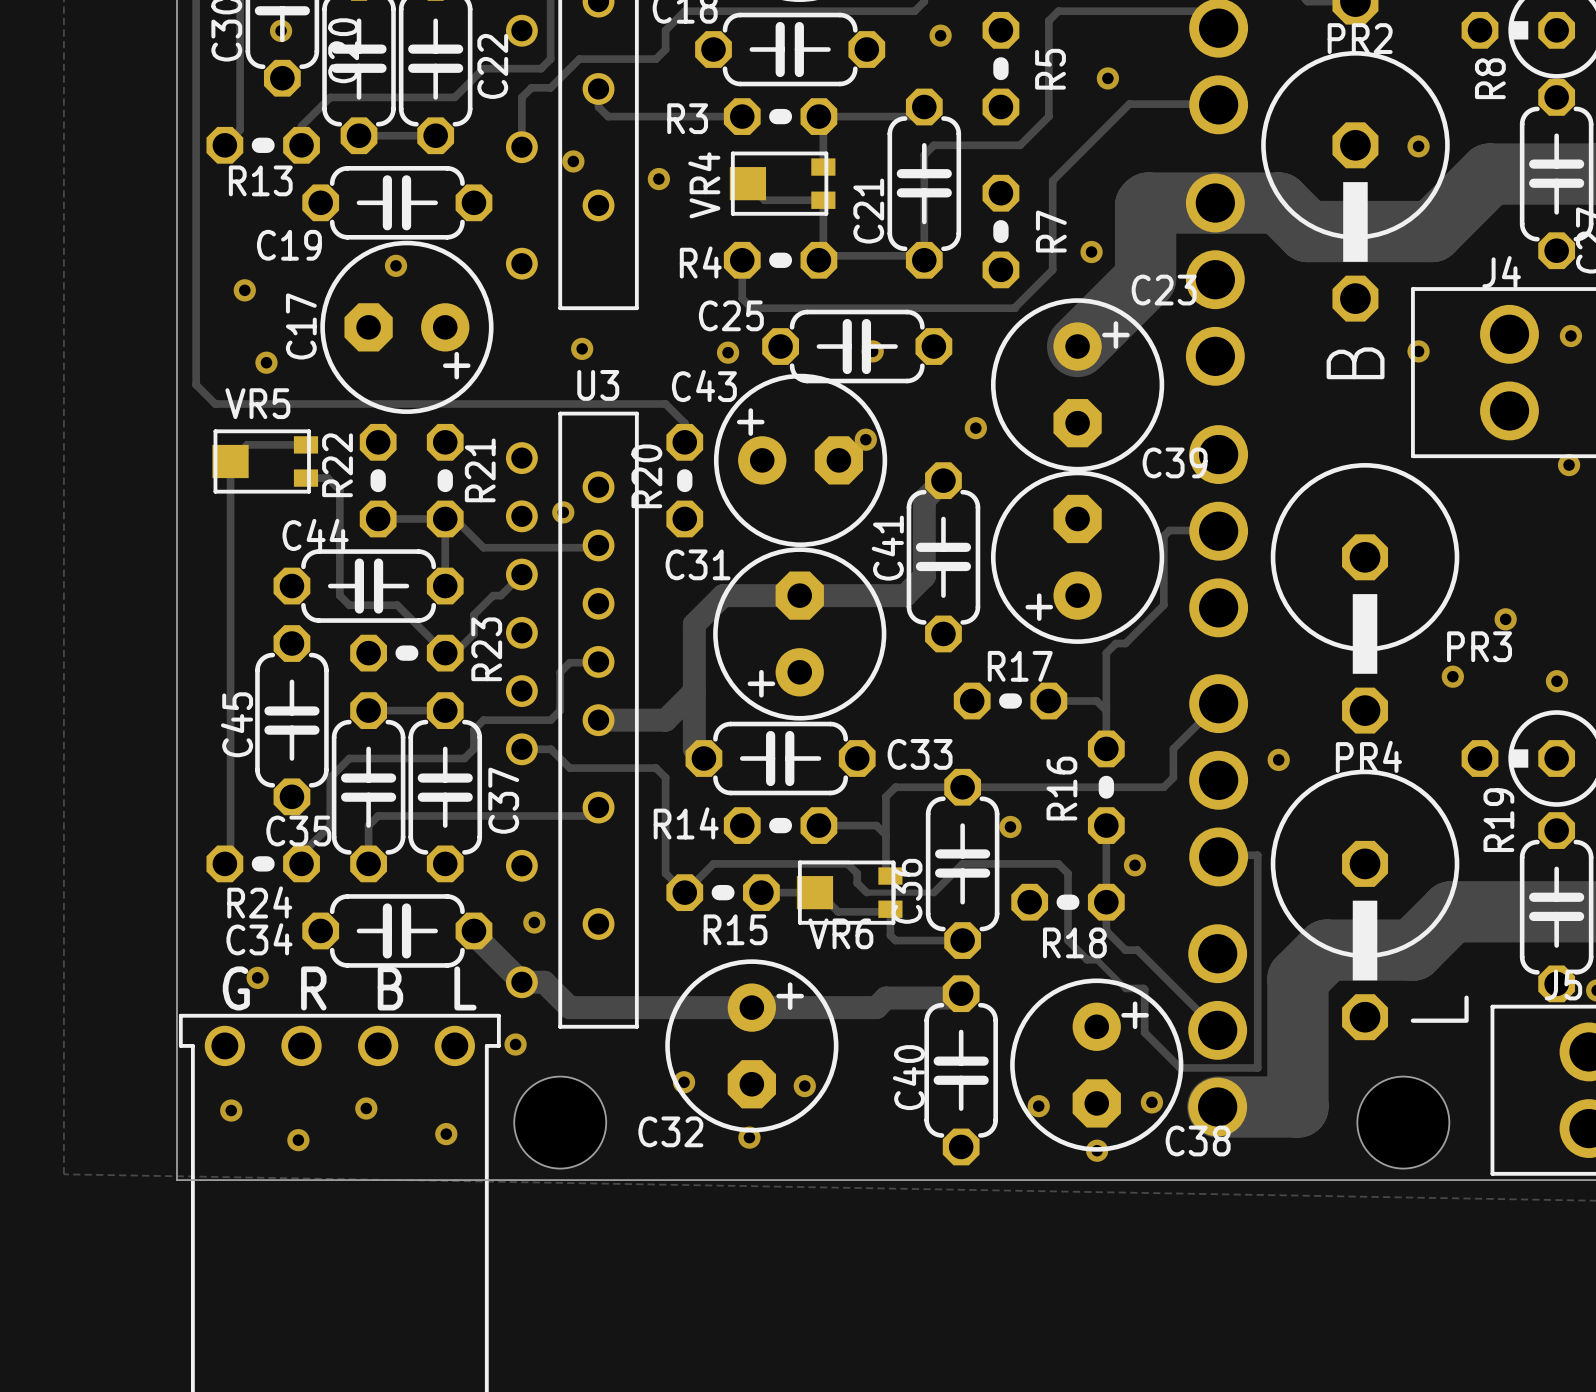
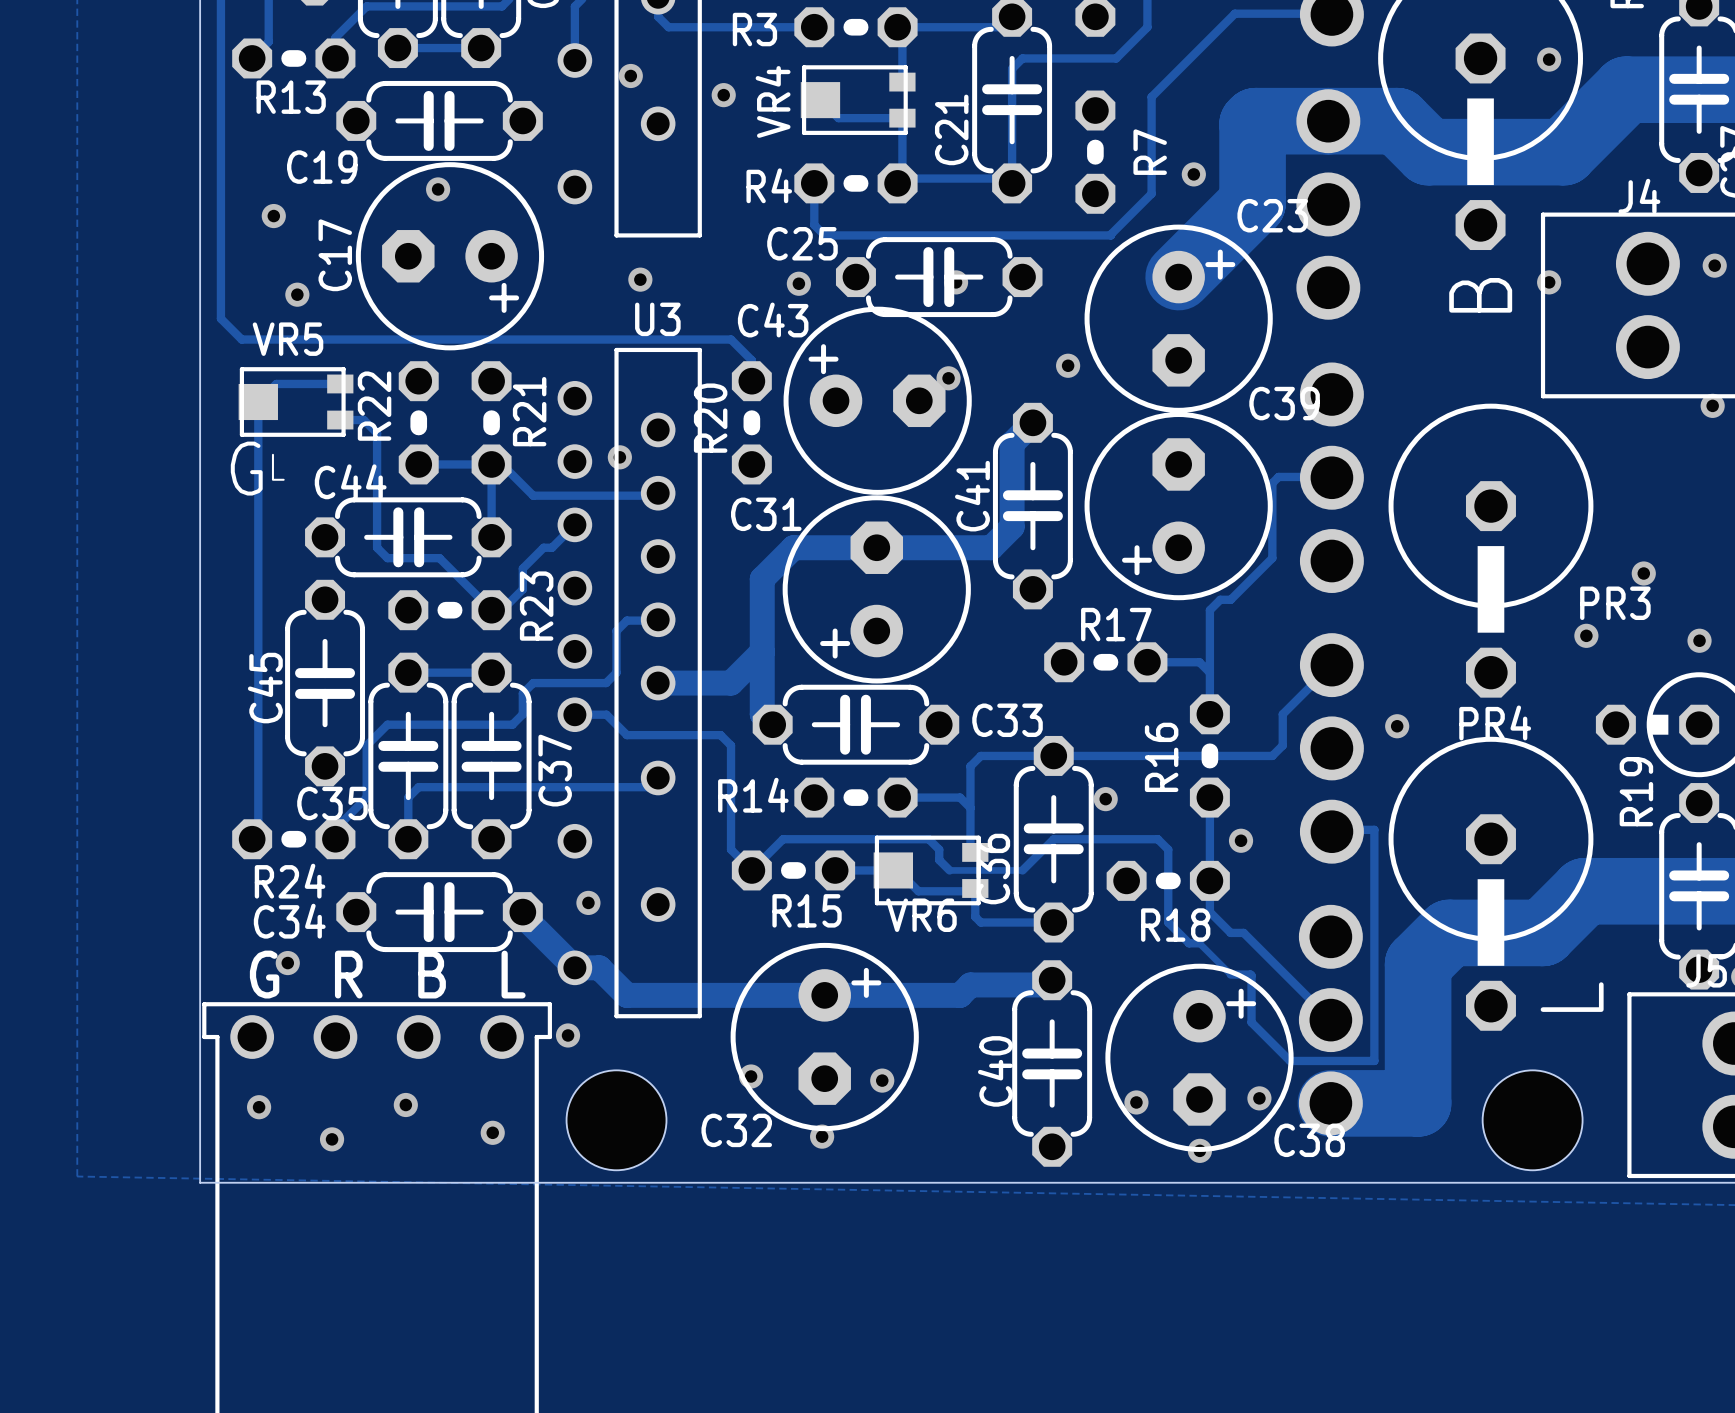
text: none -> L (278, 467)
text: none -> G (246, 468)

